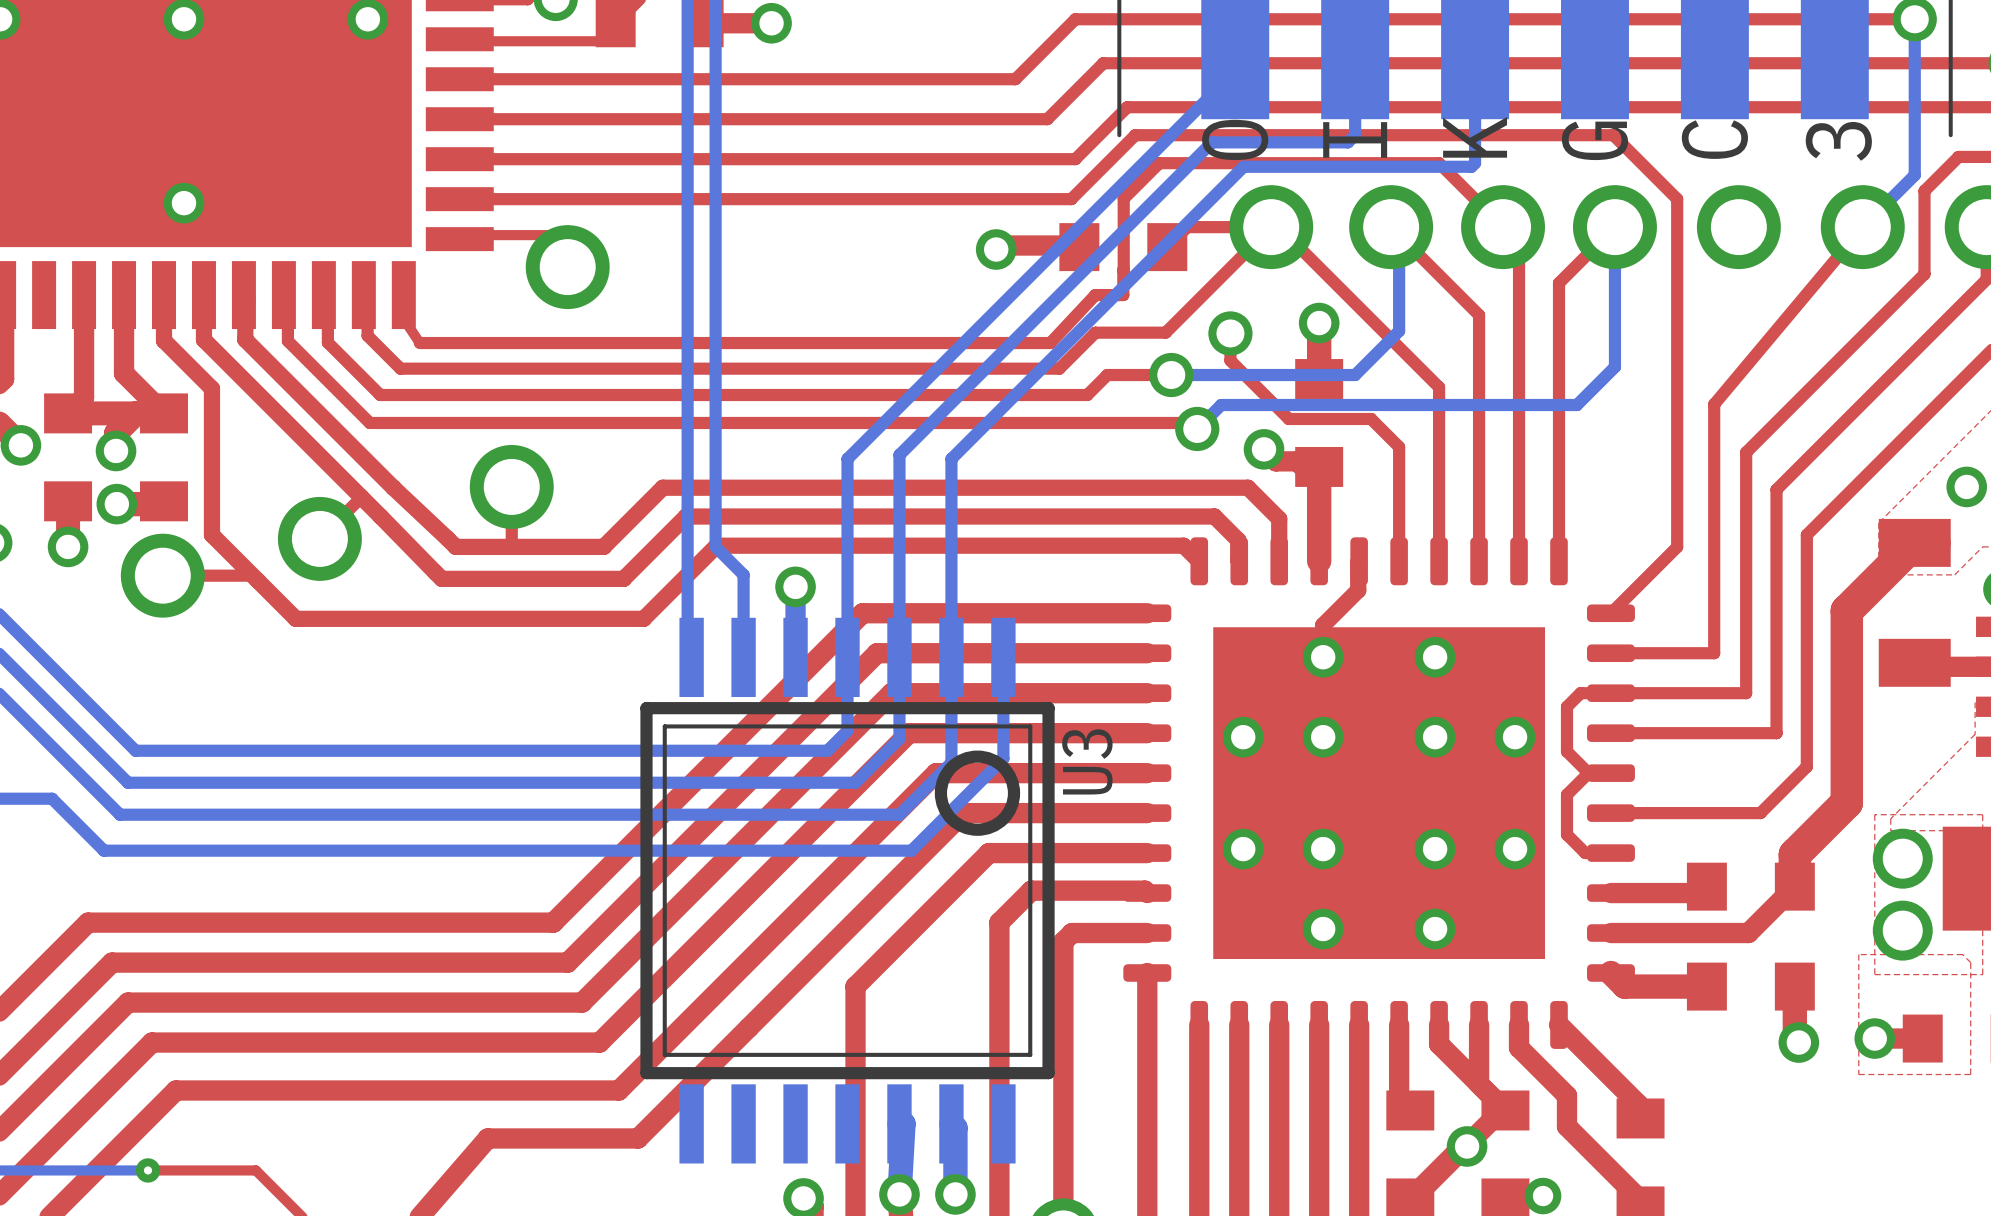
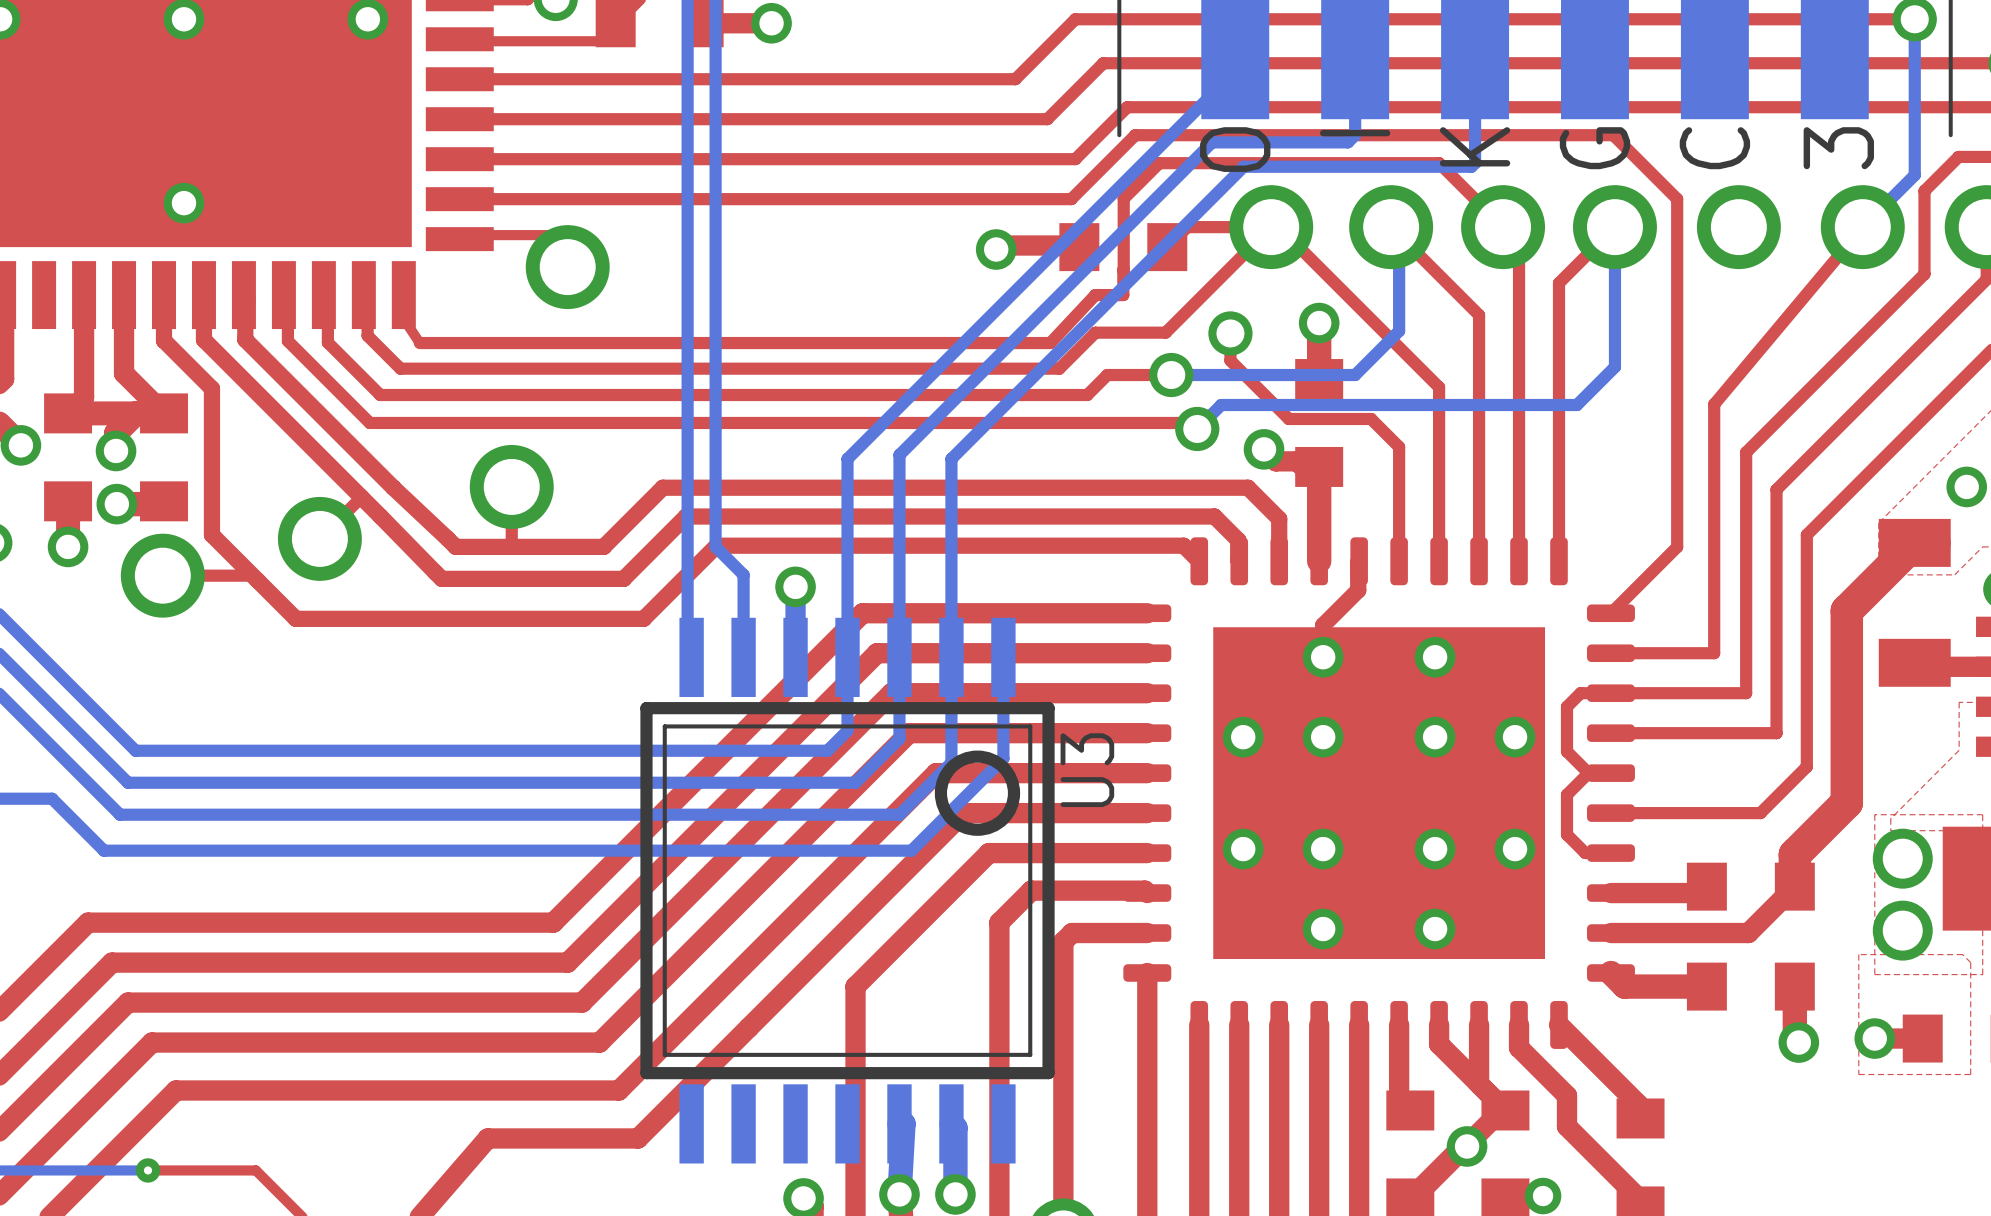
top zone outline: (1975, 702) (1975, 734) (1959, 750) -> (1975, 702) (1959, 702) (1959, 750)

